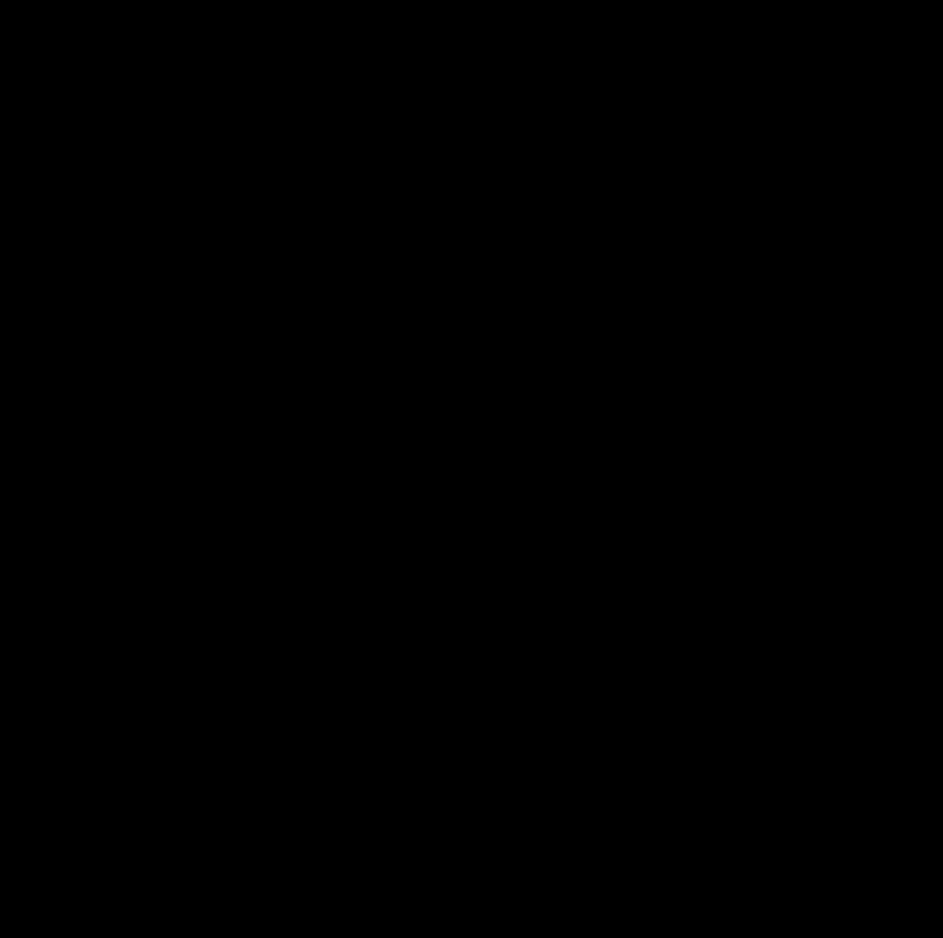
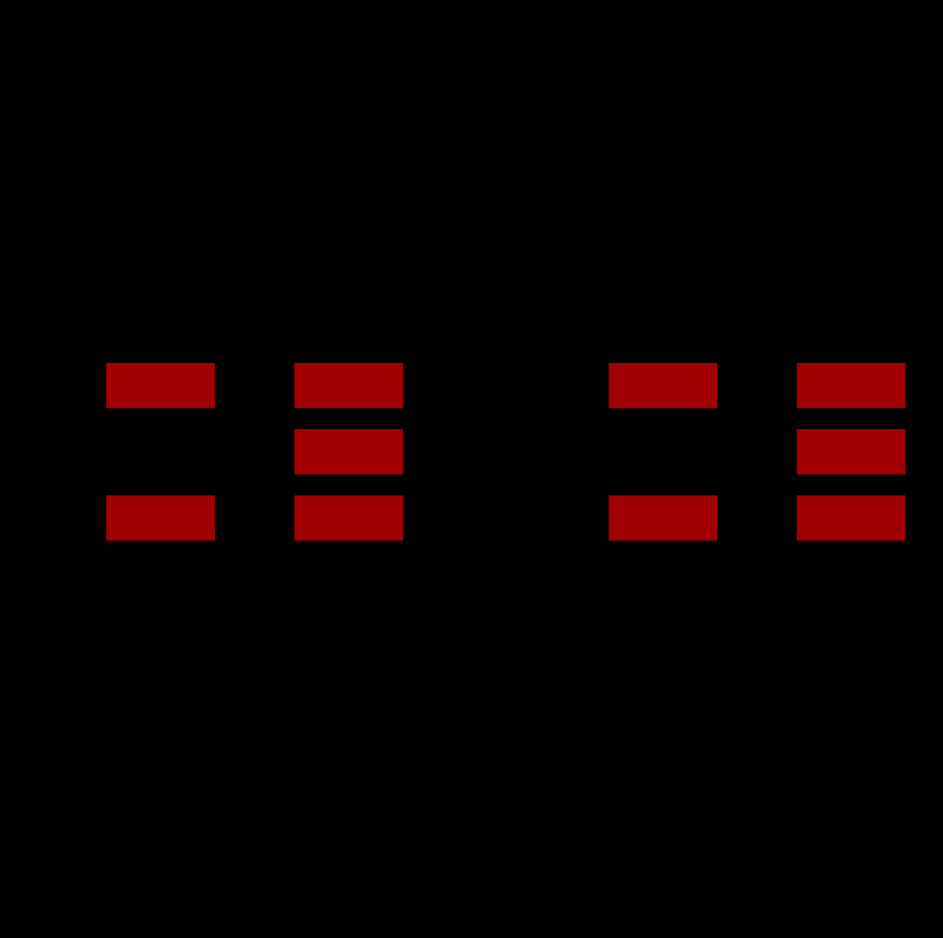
part: none -> (254, 451)
part: none -> (757, 451)

